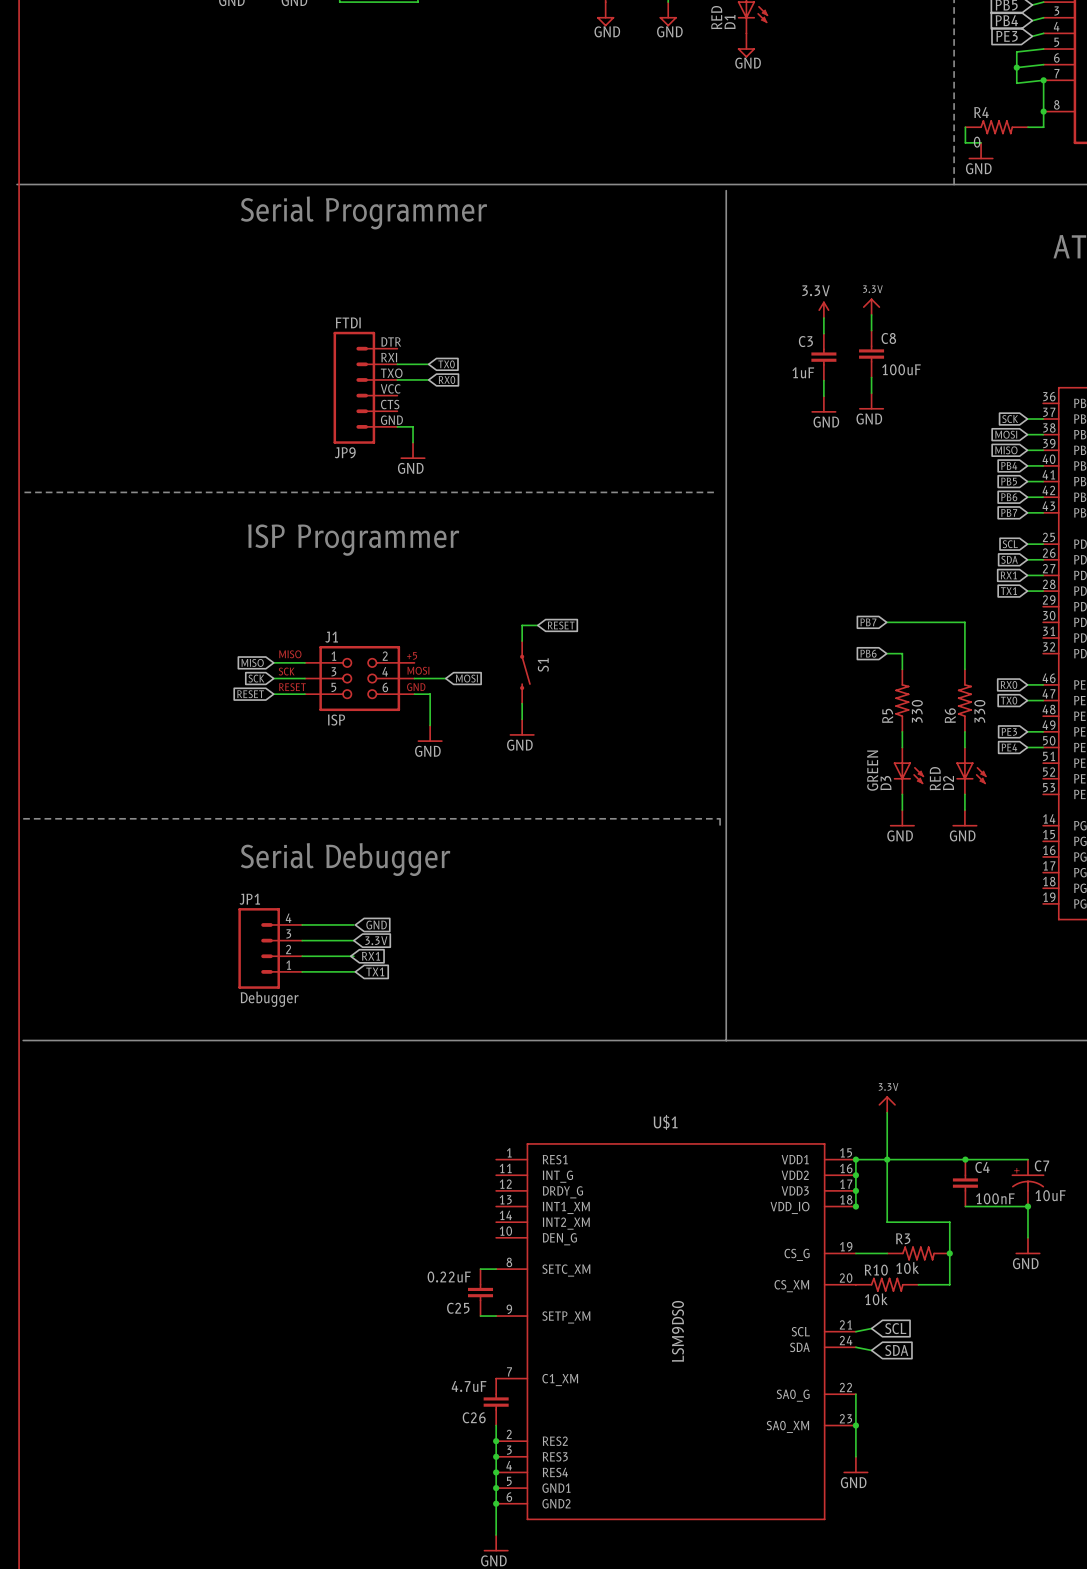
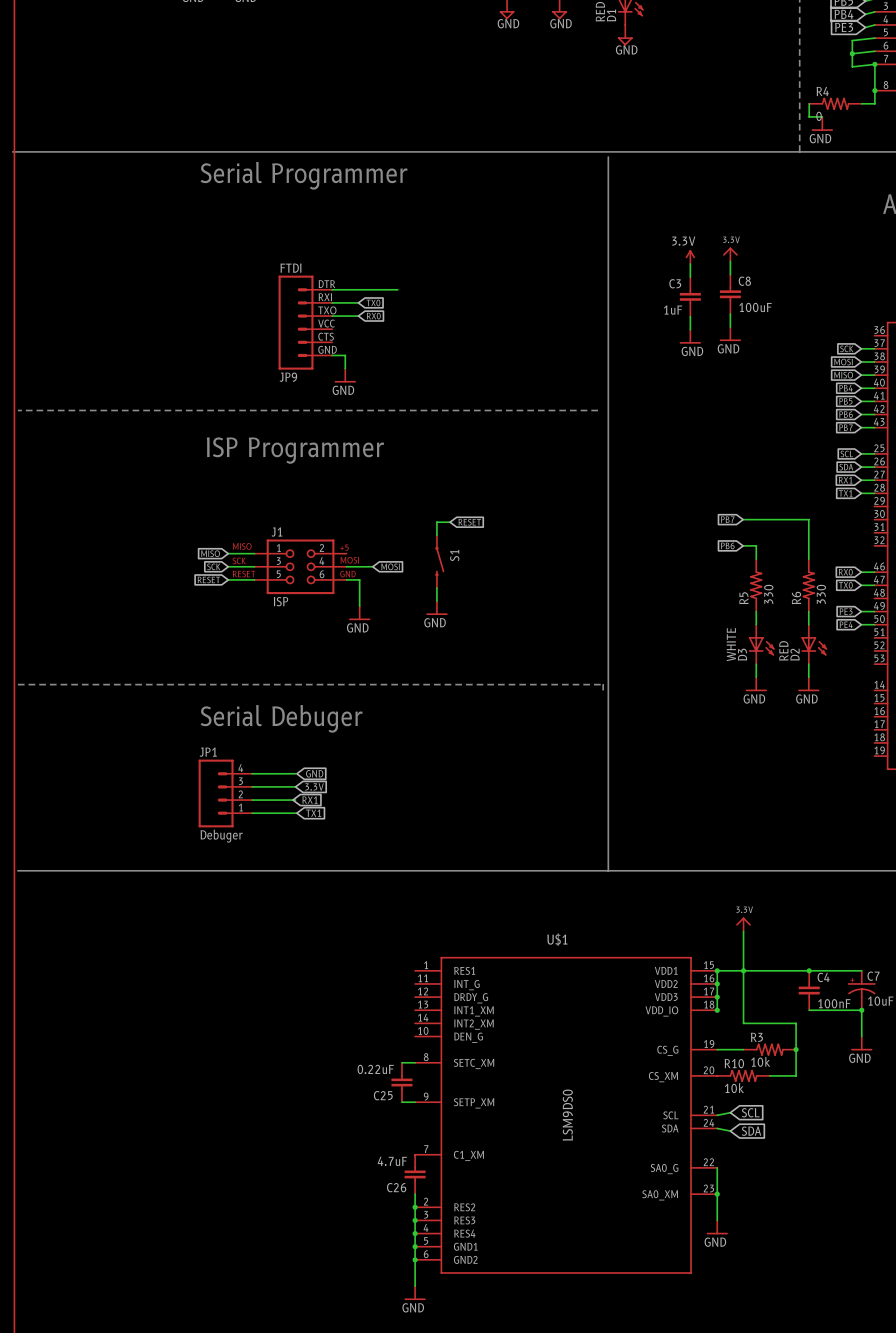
wire: none -> (332, 289) (397, 289)
D3 value: GREEN (872, 770) -> WHITE (731, 644)
text: Serial Debugger (345, 859) -> Serial Debuger (281, 718)
JP1 value: Debugger (269, 999) -> Debuger (221, 836)

